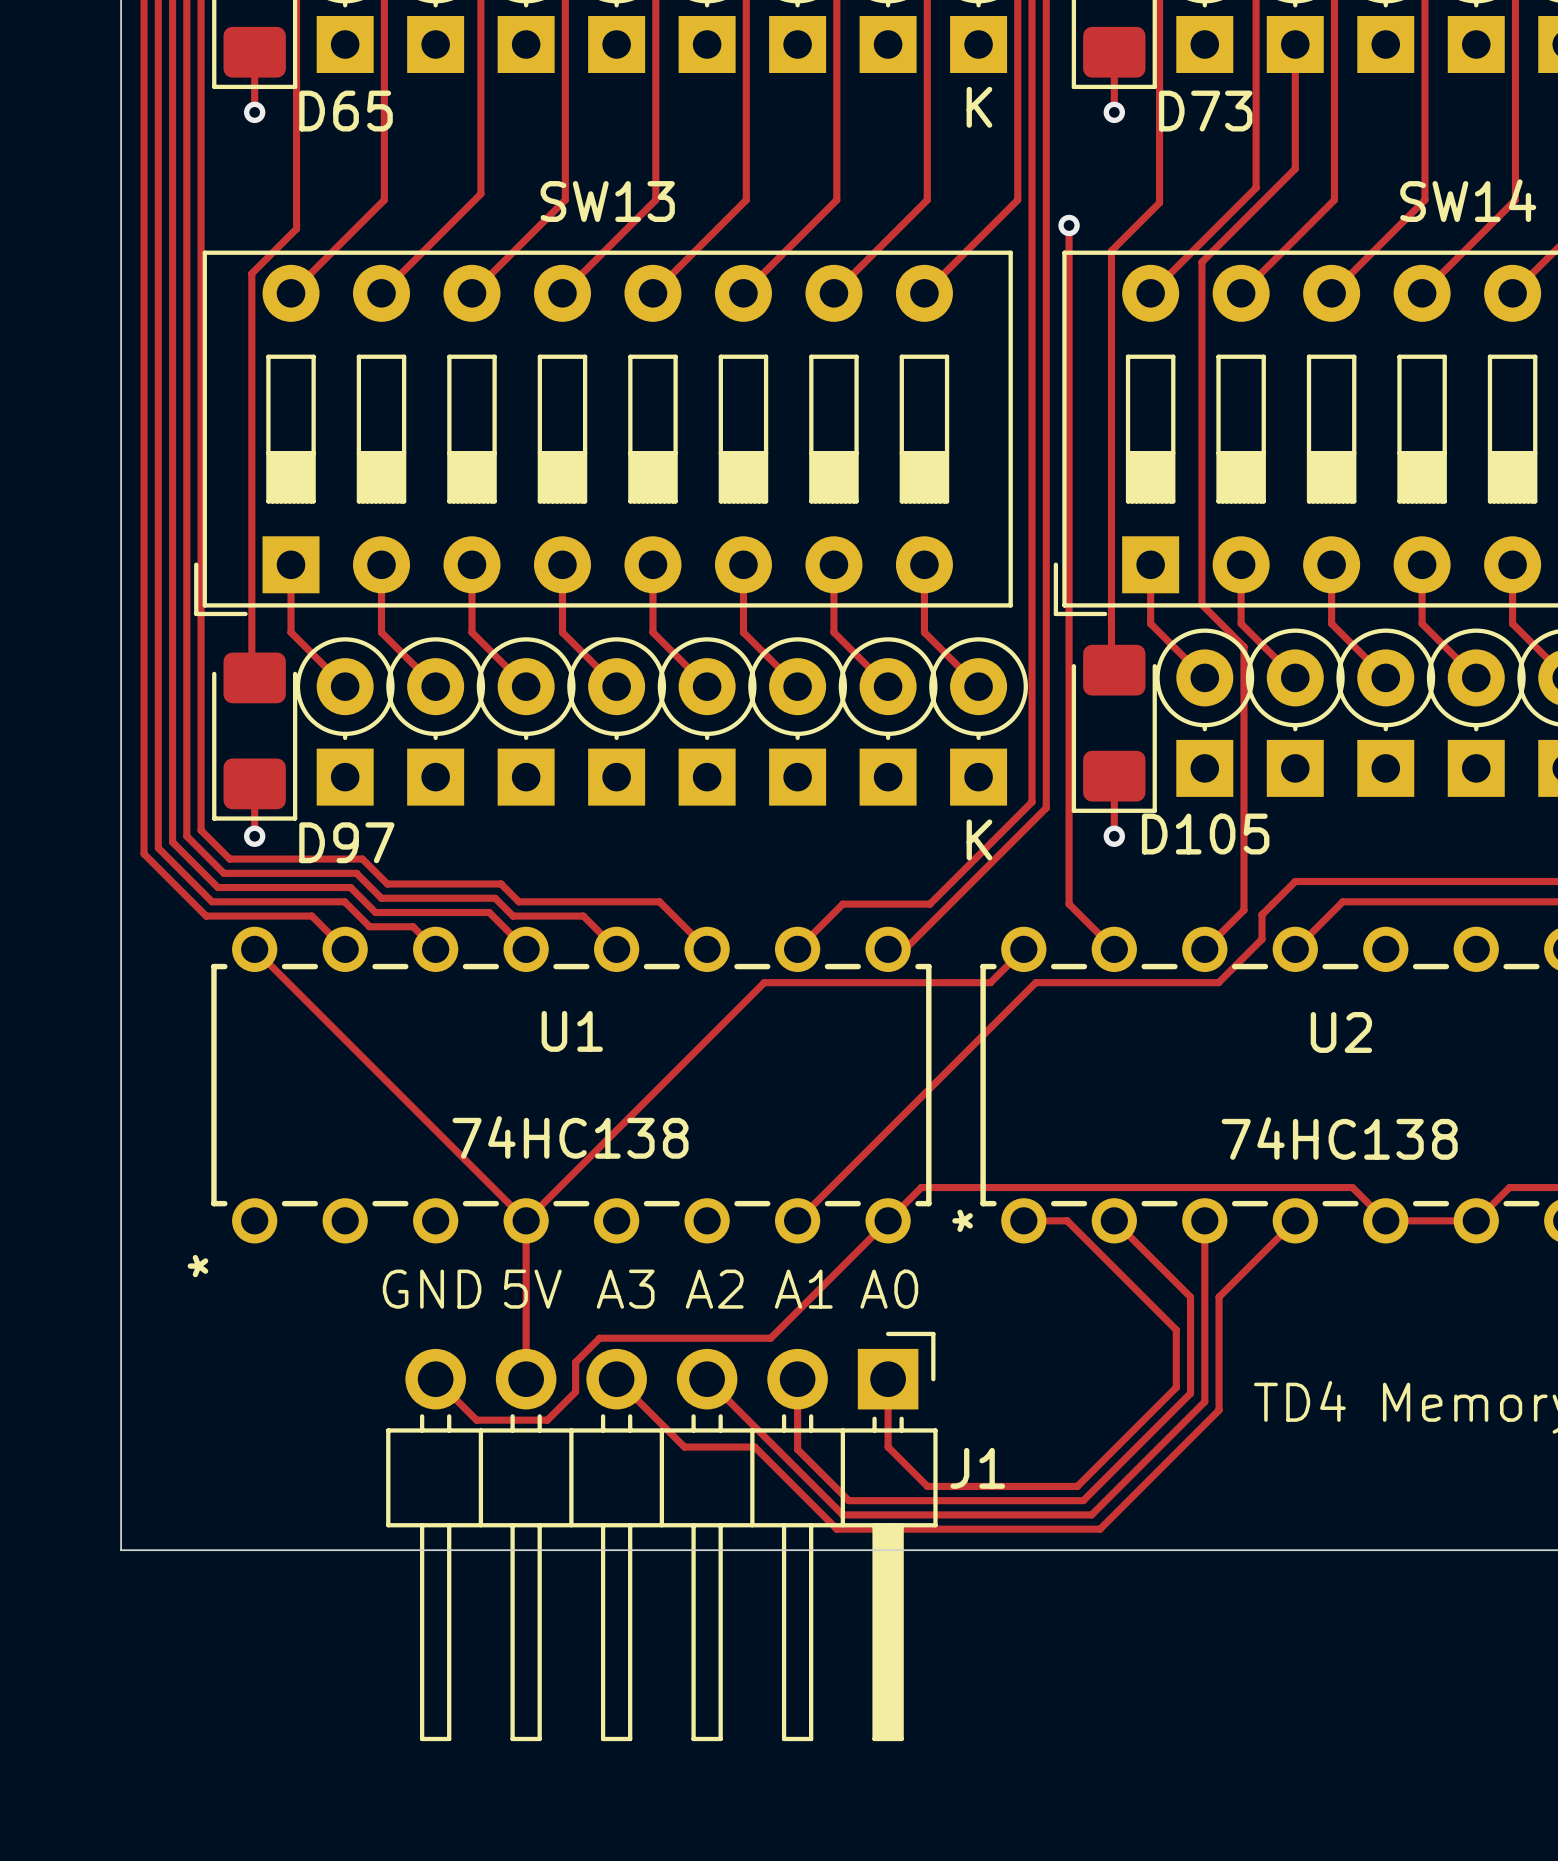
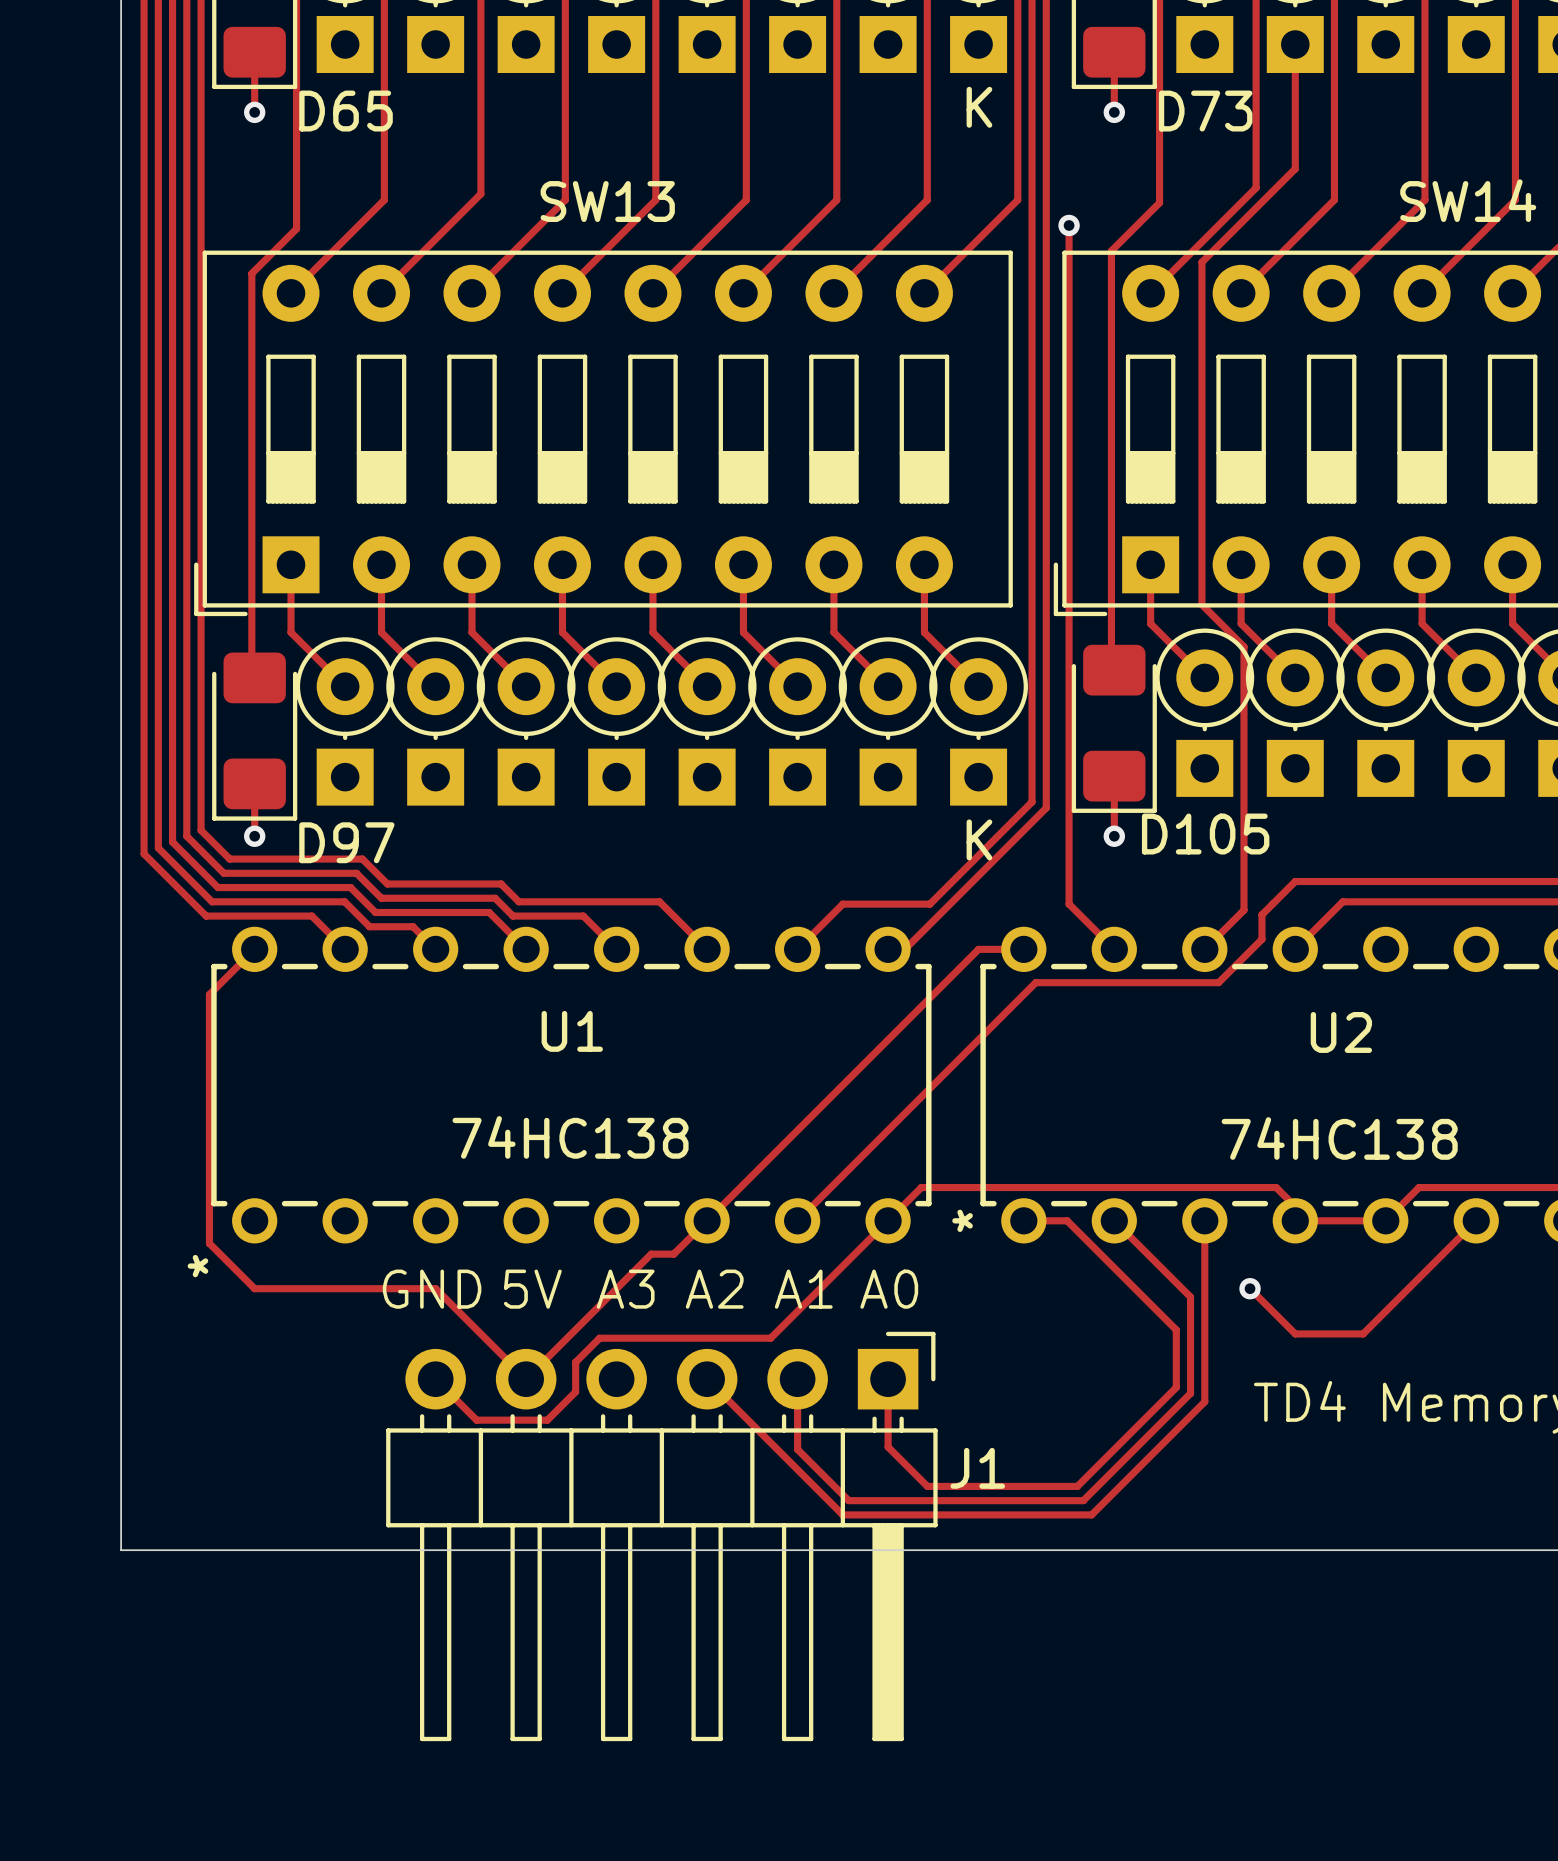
track: (254, 949) (526, 1220) -> none
track: (1023, 949) (990, 982) (764, 982) (526, 1220) -> (1023, 949) (978, 949) (673, 1254) (651, 1254) (526, 1379) (435, 1288) (254, 1288) (209, 1243) (209, 994) (254, 949)
track: (1276, 1187) (1352, 1187) (1385, 1220) (1476, 1220) (1509, 1187) -> (1295, 1220) (1385, 1220) (1419, 1187) (1509, 1187)
track: none -> (1276, 1187) (1295, 1206)
track: (526, 1220) (526, 1379) -> none
track: (1295, 1220) (1219, 1297) (1219, 1410) (1100, 1529) (836, 1529) (754, 1447) (684, 1447) (616, 1379) -> none
track: none -> (1476, 1220) (1363, 1333) (1295, 1333) (1250, 1288)
via: none -> (1250, 1288)

